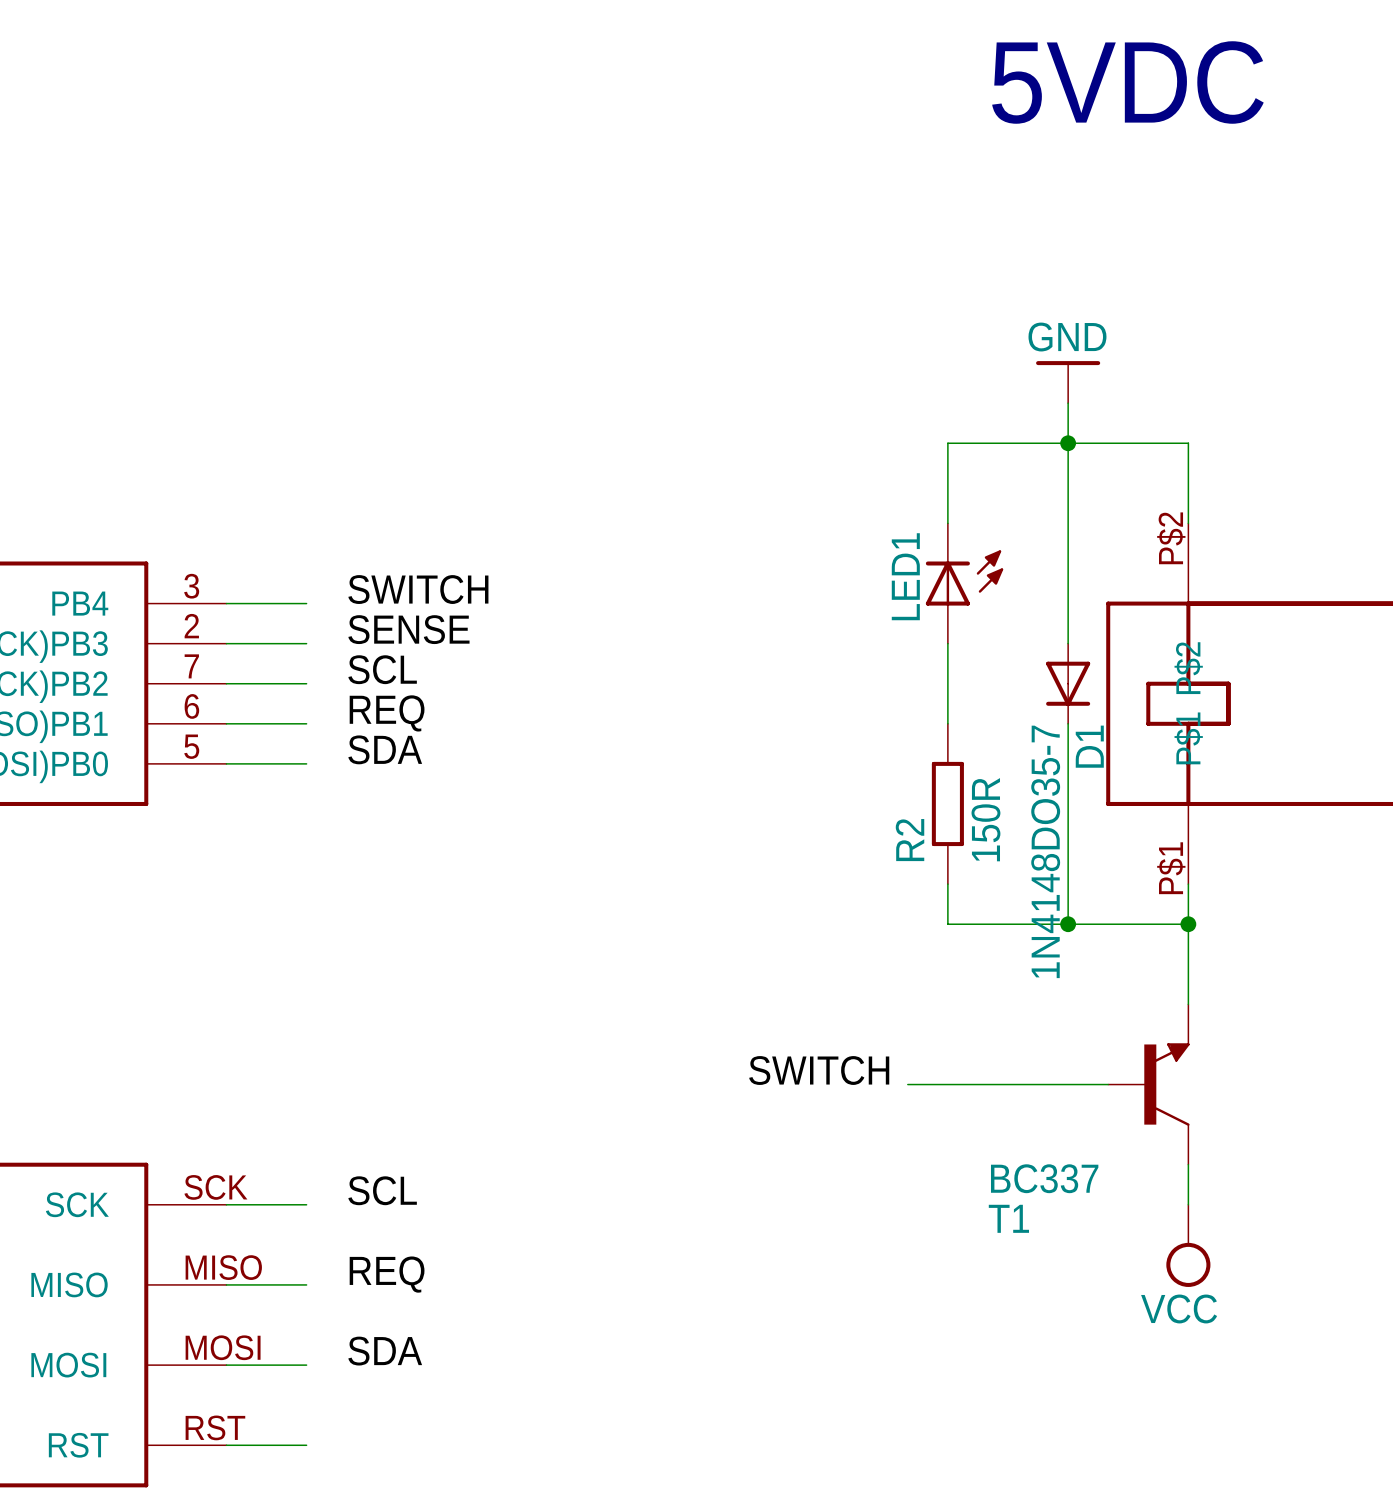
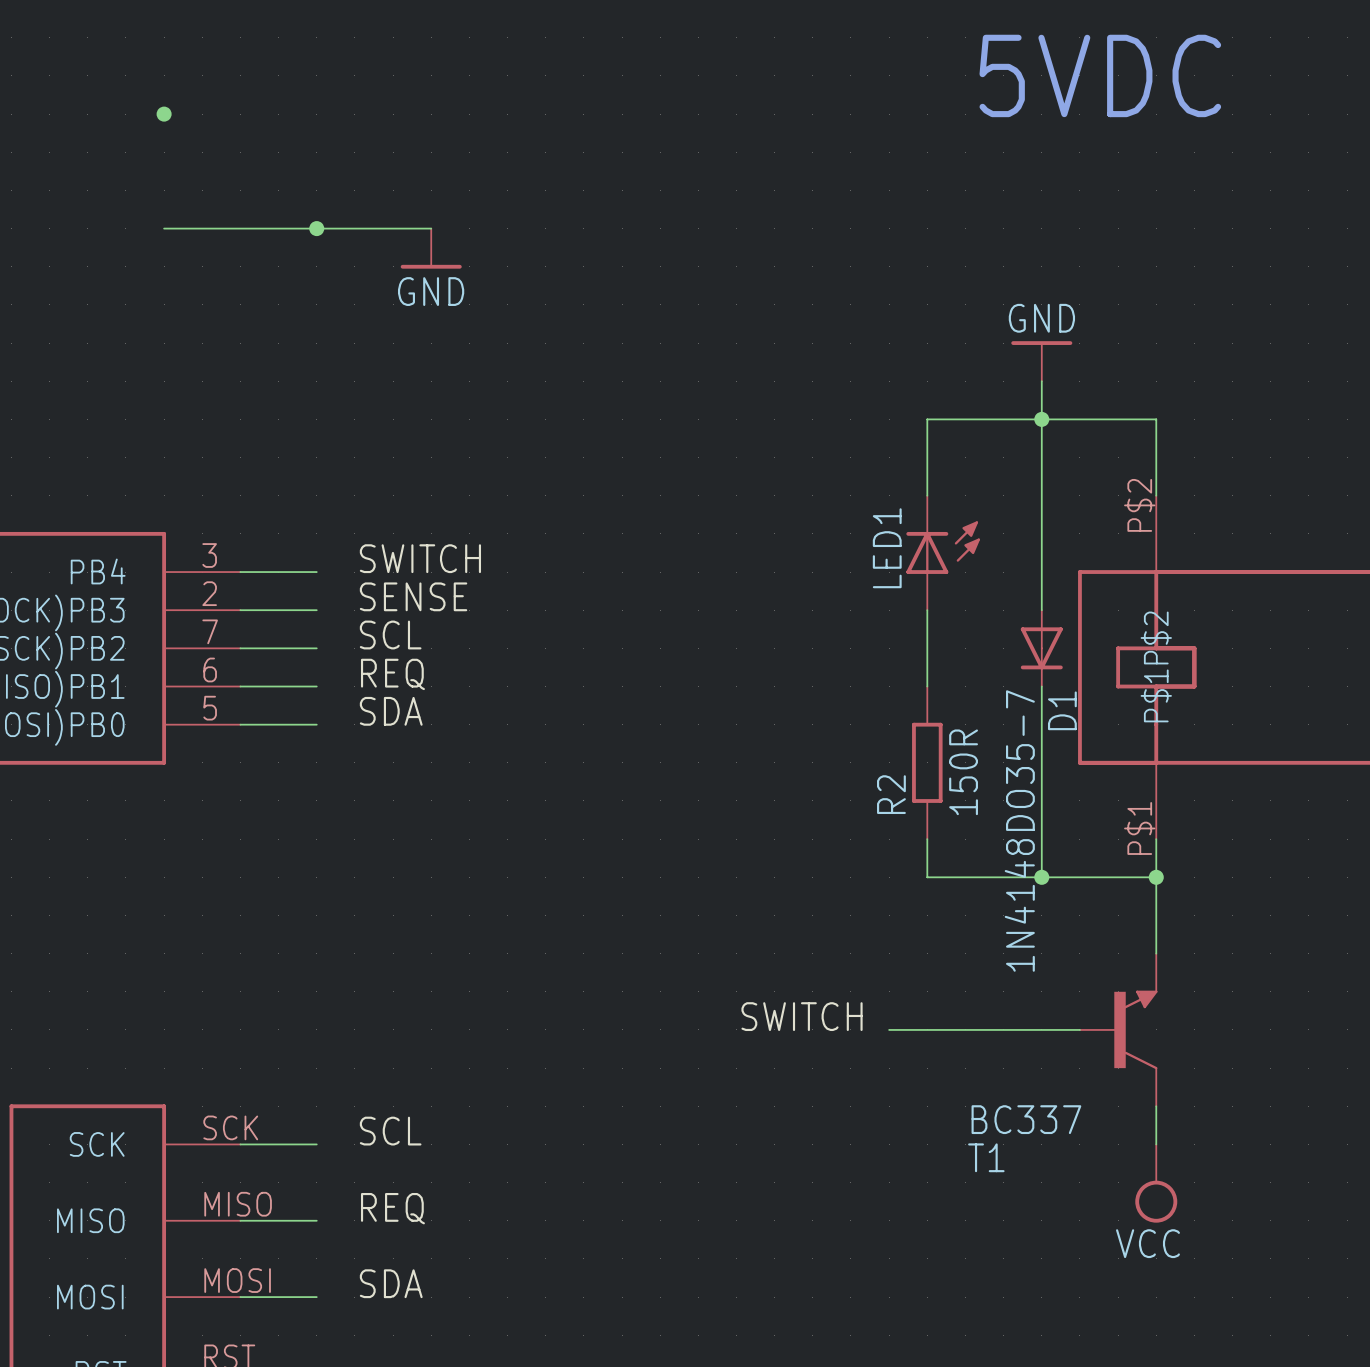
junction: none -> (164, 114)
wire: none -> (164, 228) (431, 228)
junction: none -> (316, 228)
power symbol: none -> GND (431, 248)

